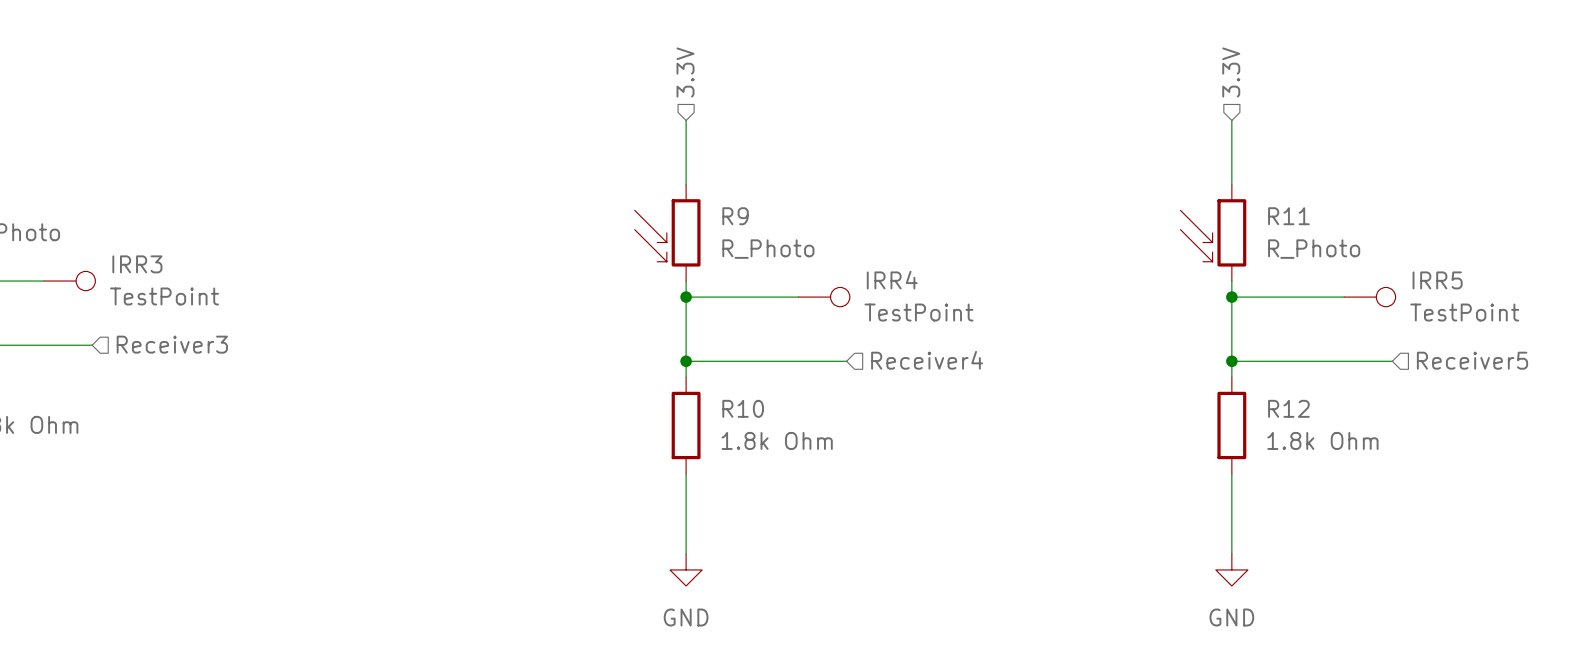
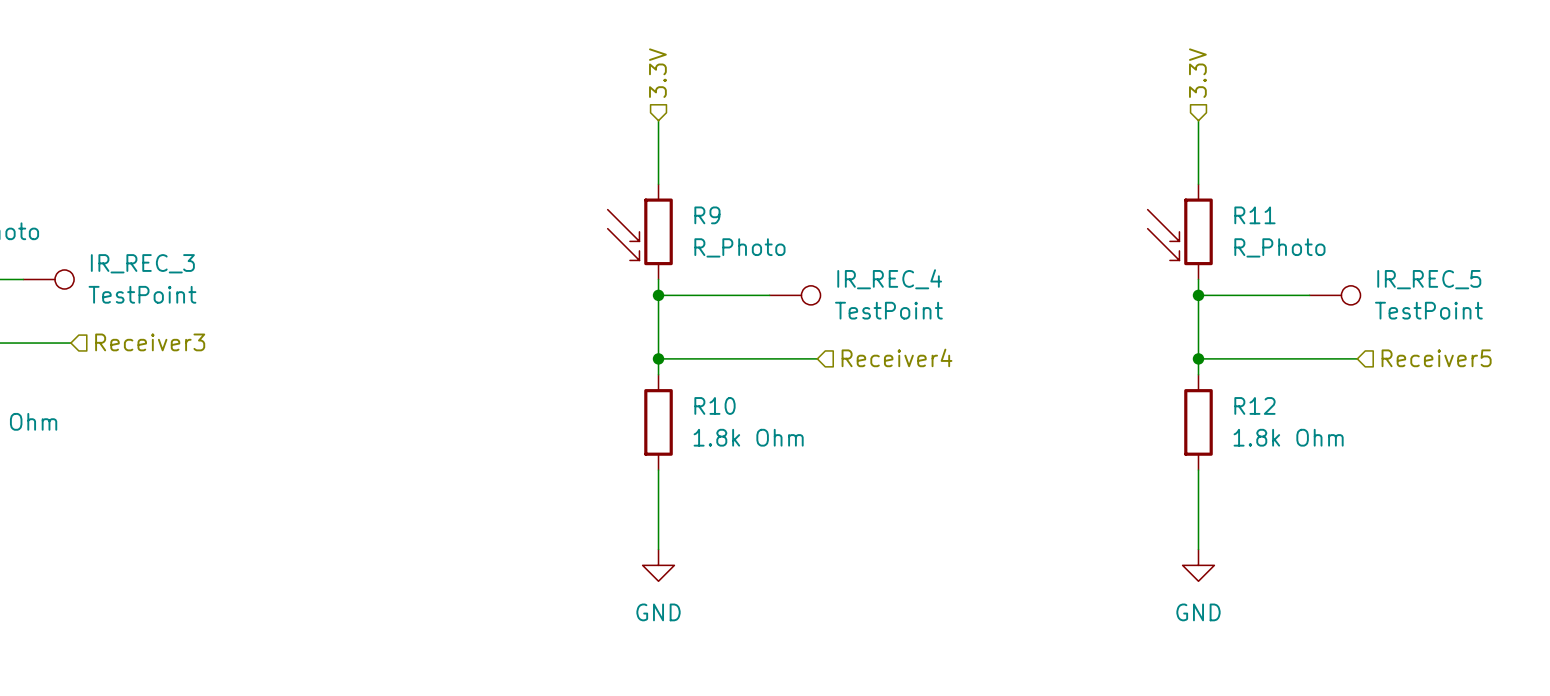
IRR3 name: IRR3 (137, 264) -> IR_REC_3 (142, 263)
IRR4 name: IRR4 (892, 280) -> IR_REC_4 (889, 279)
IRR5 name: IRR5 (1437, 280) -> IR_REC_5 (1429, 279)

